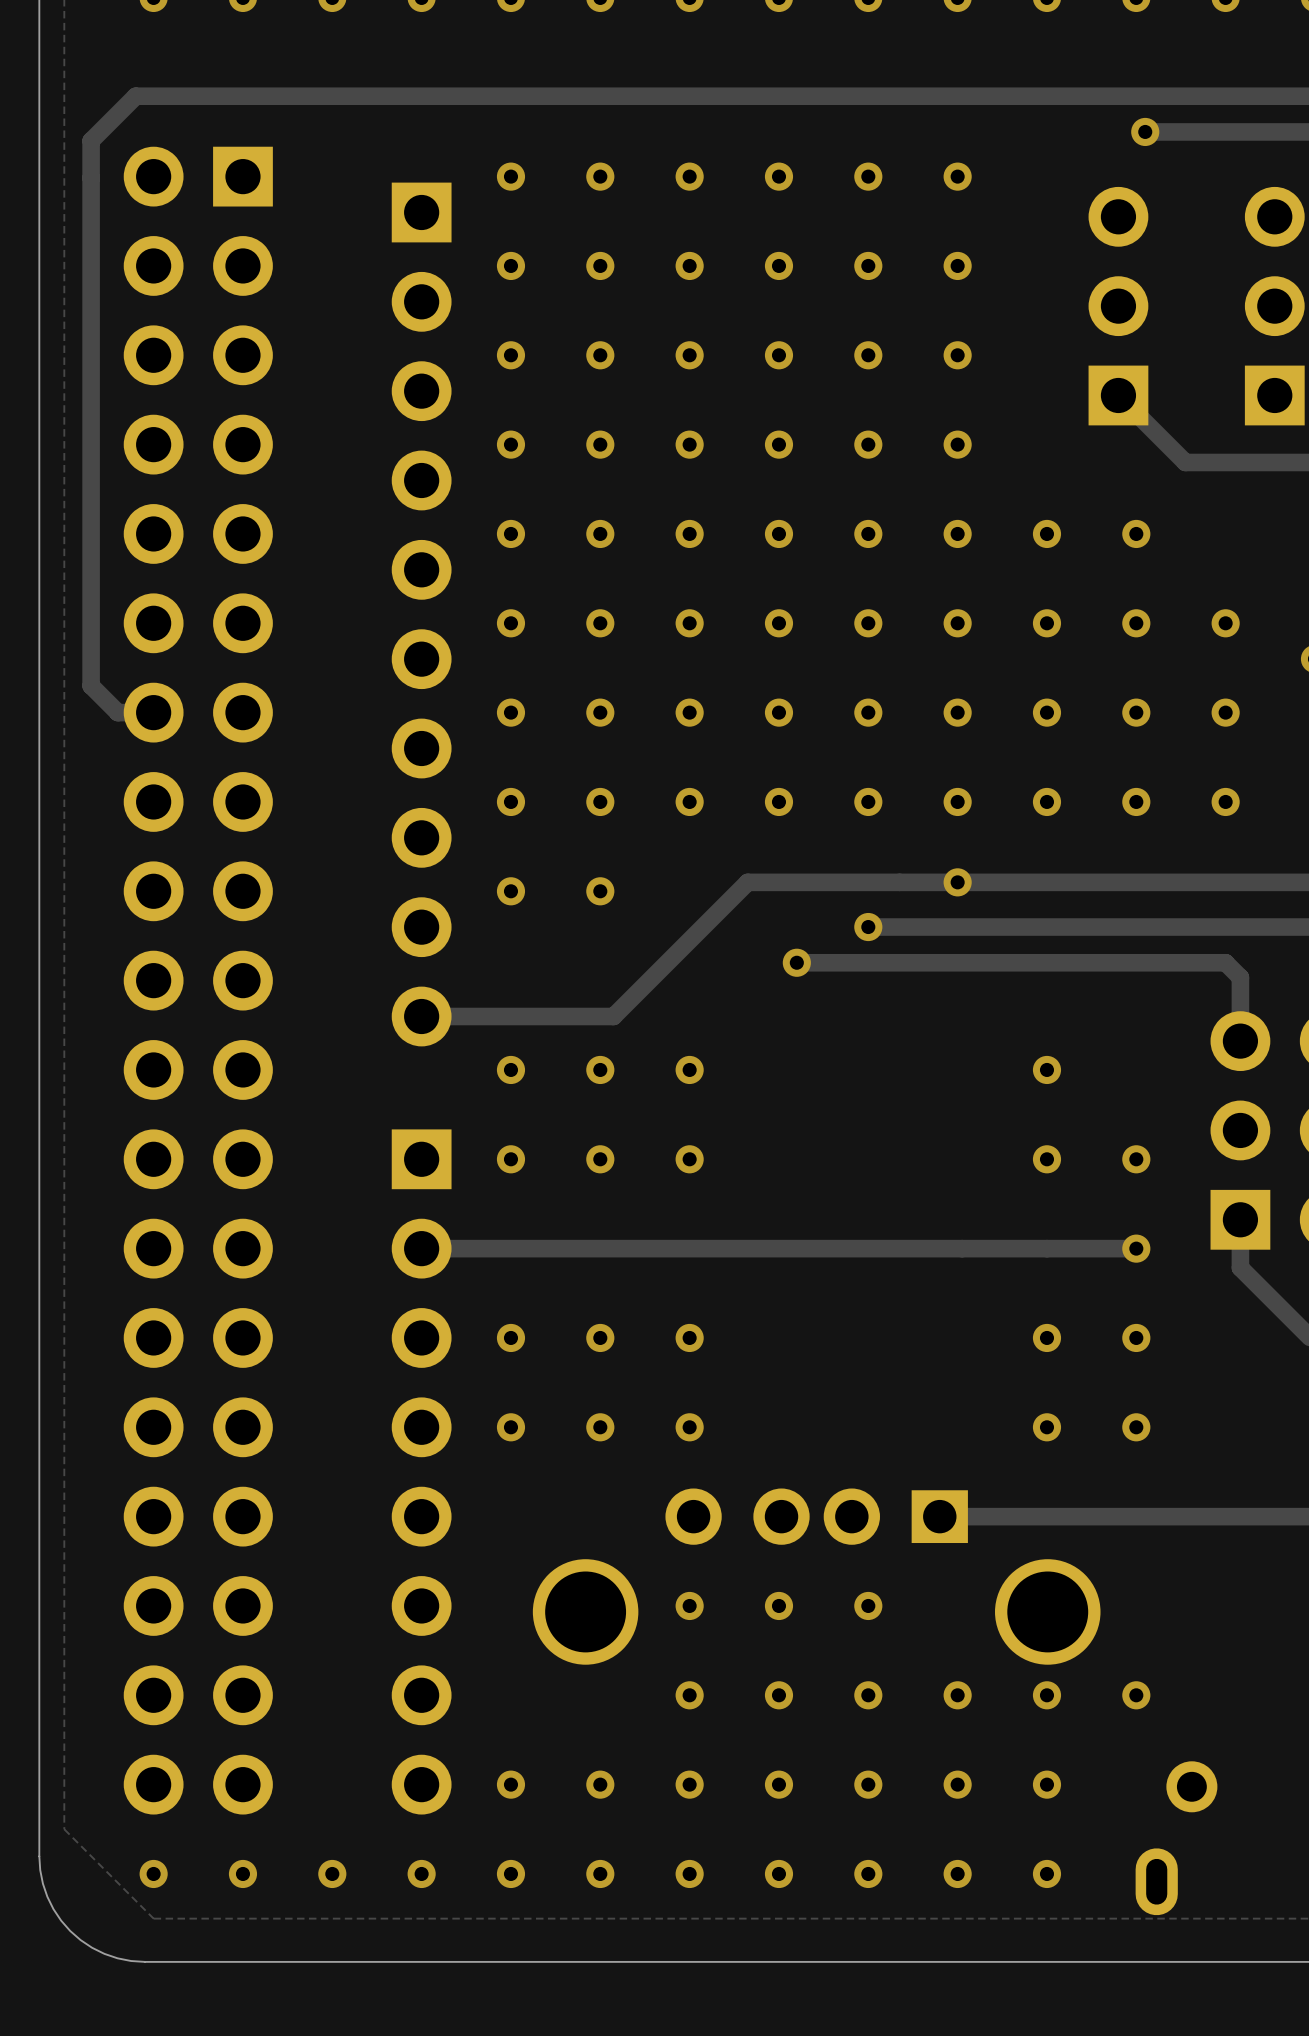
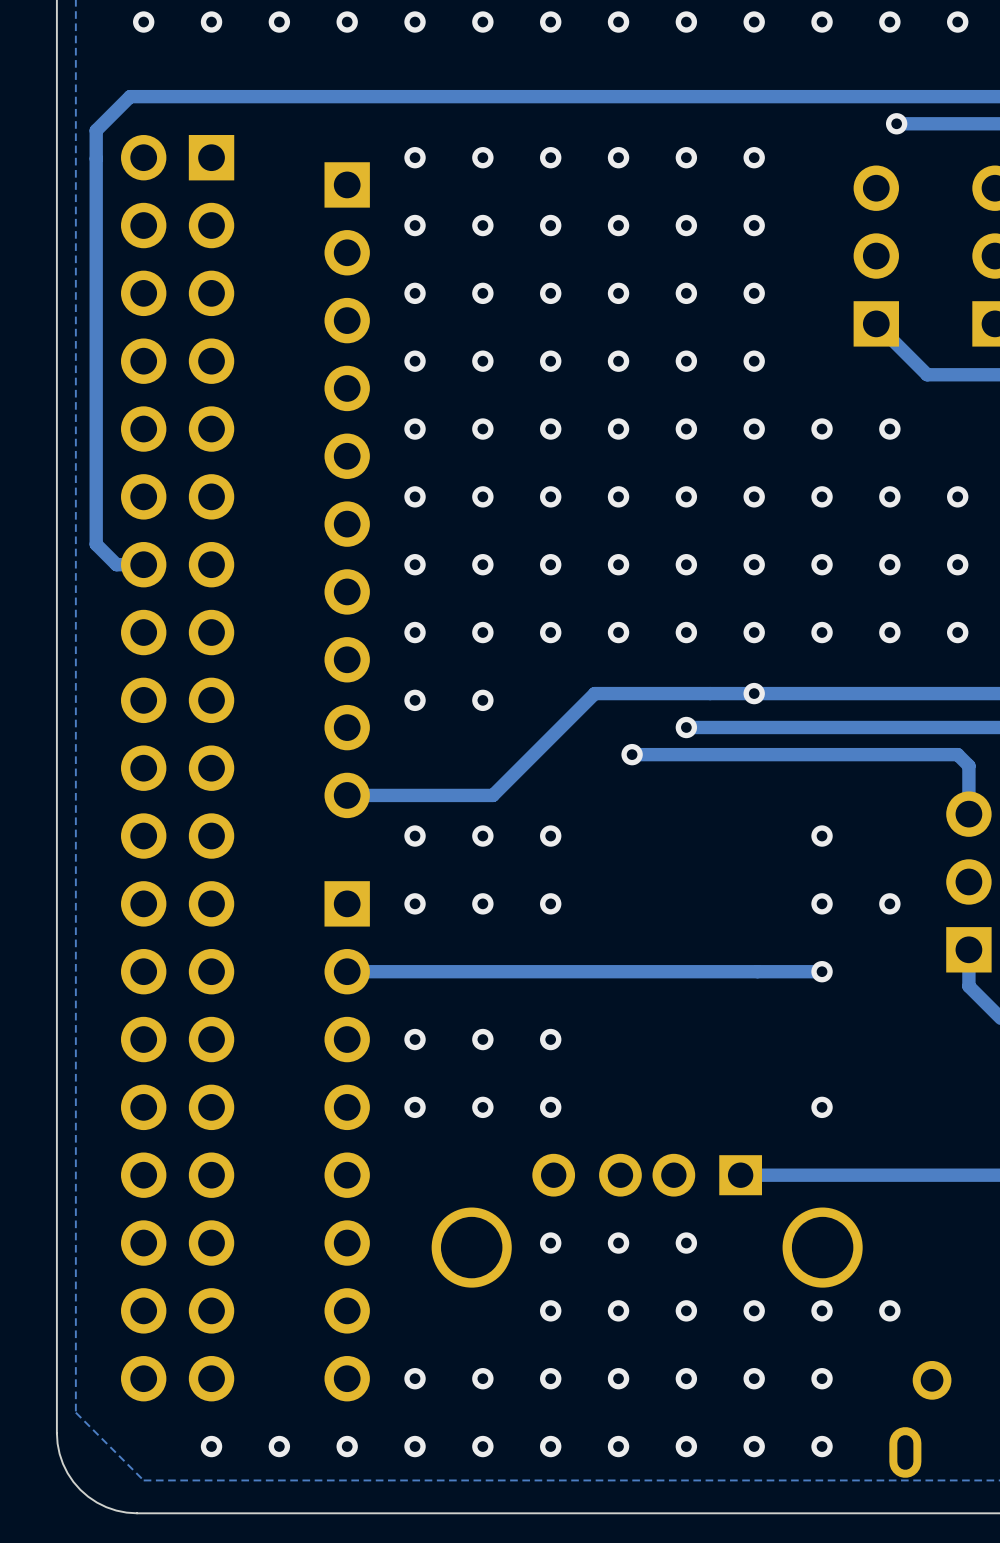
via: none -> (822, 971)
track: (1136, 1248) (1046, 1248) -> none
via: (1136, 1248) -> none
via: (1046, 1337) -> none
via: (1136, 1337) -> none
via: (1136, 1427) -> none
via: (153, 1873) -> none

